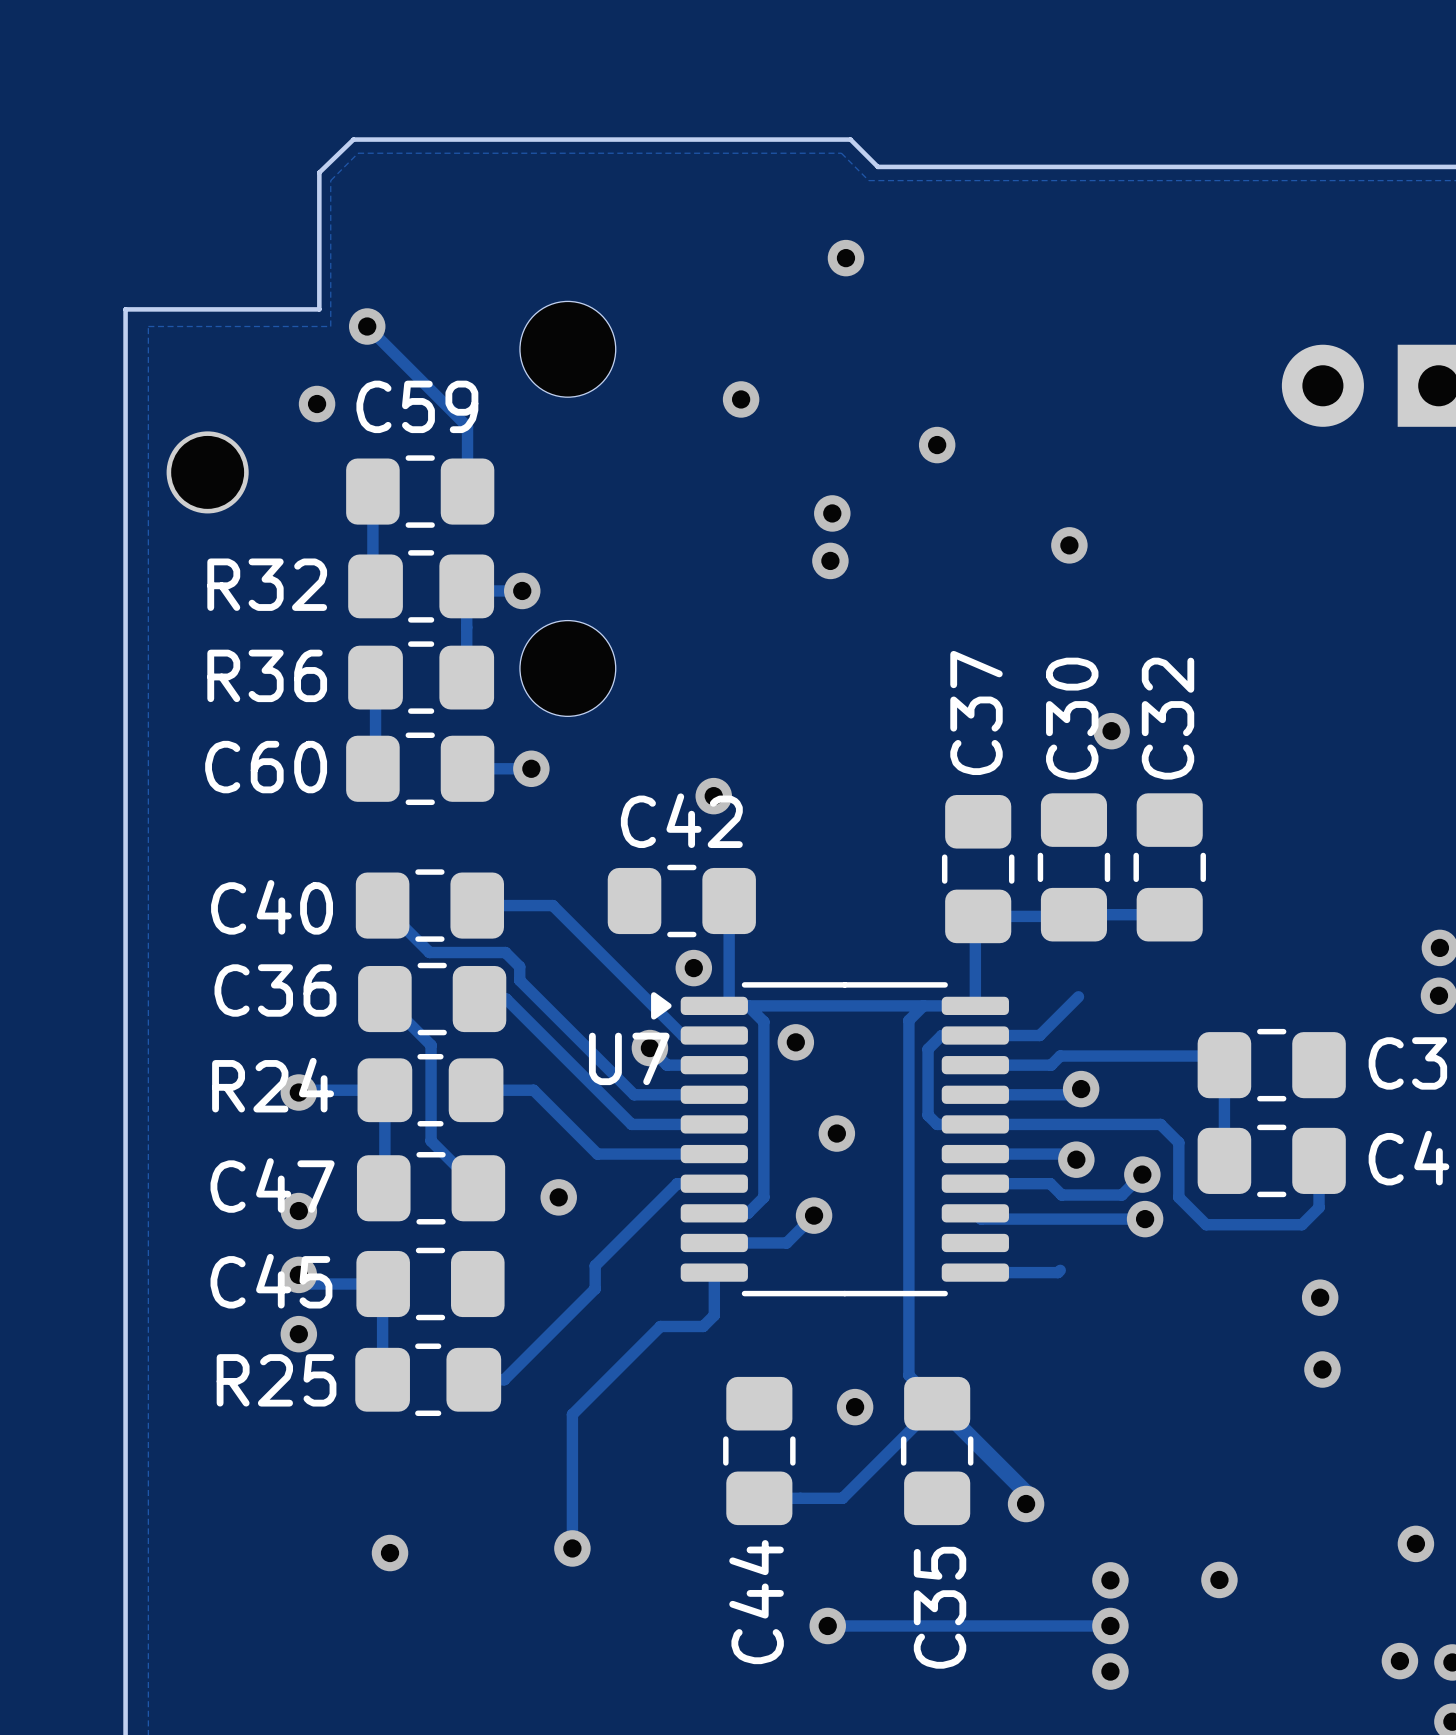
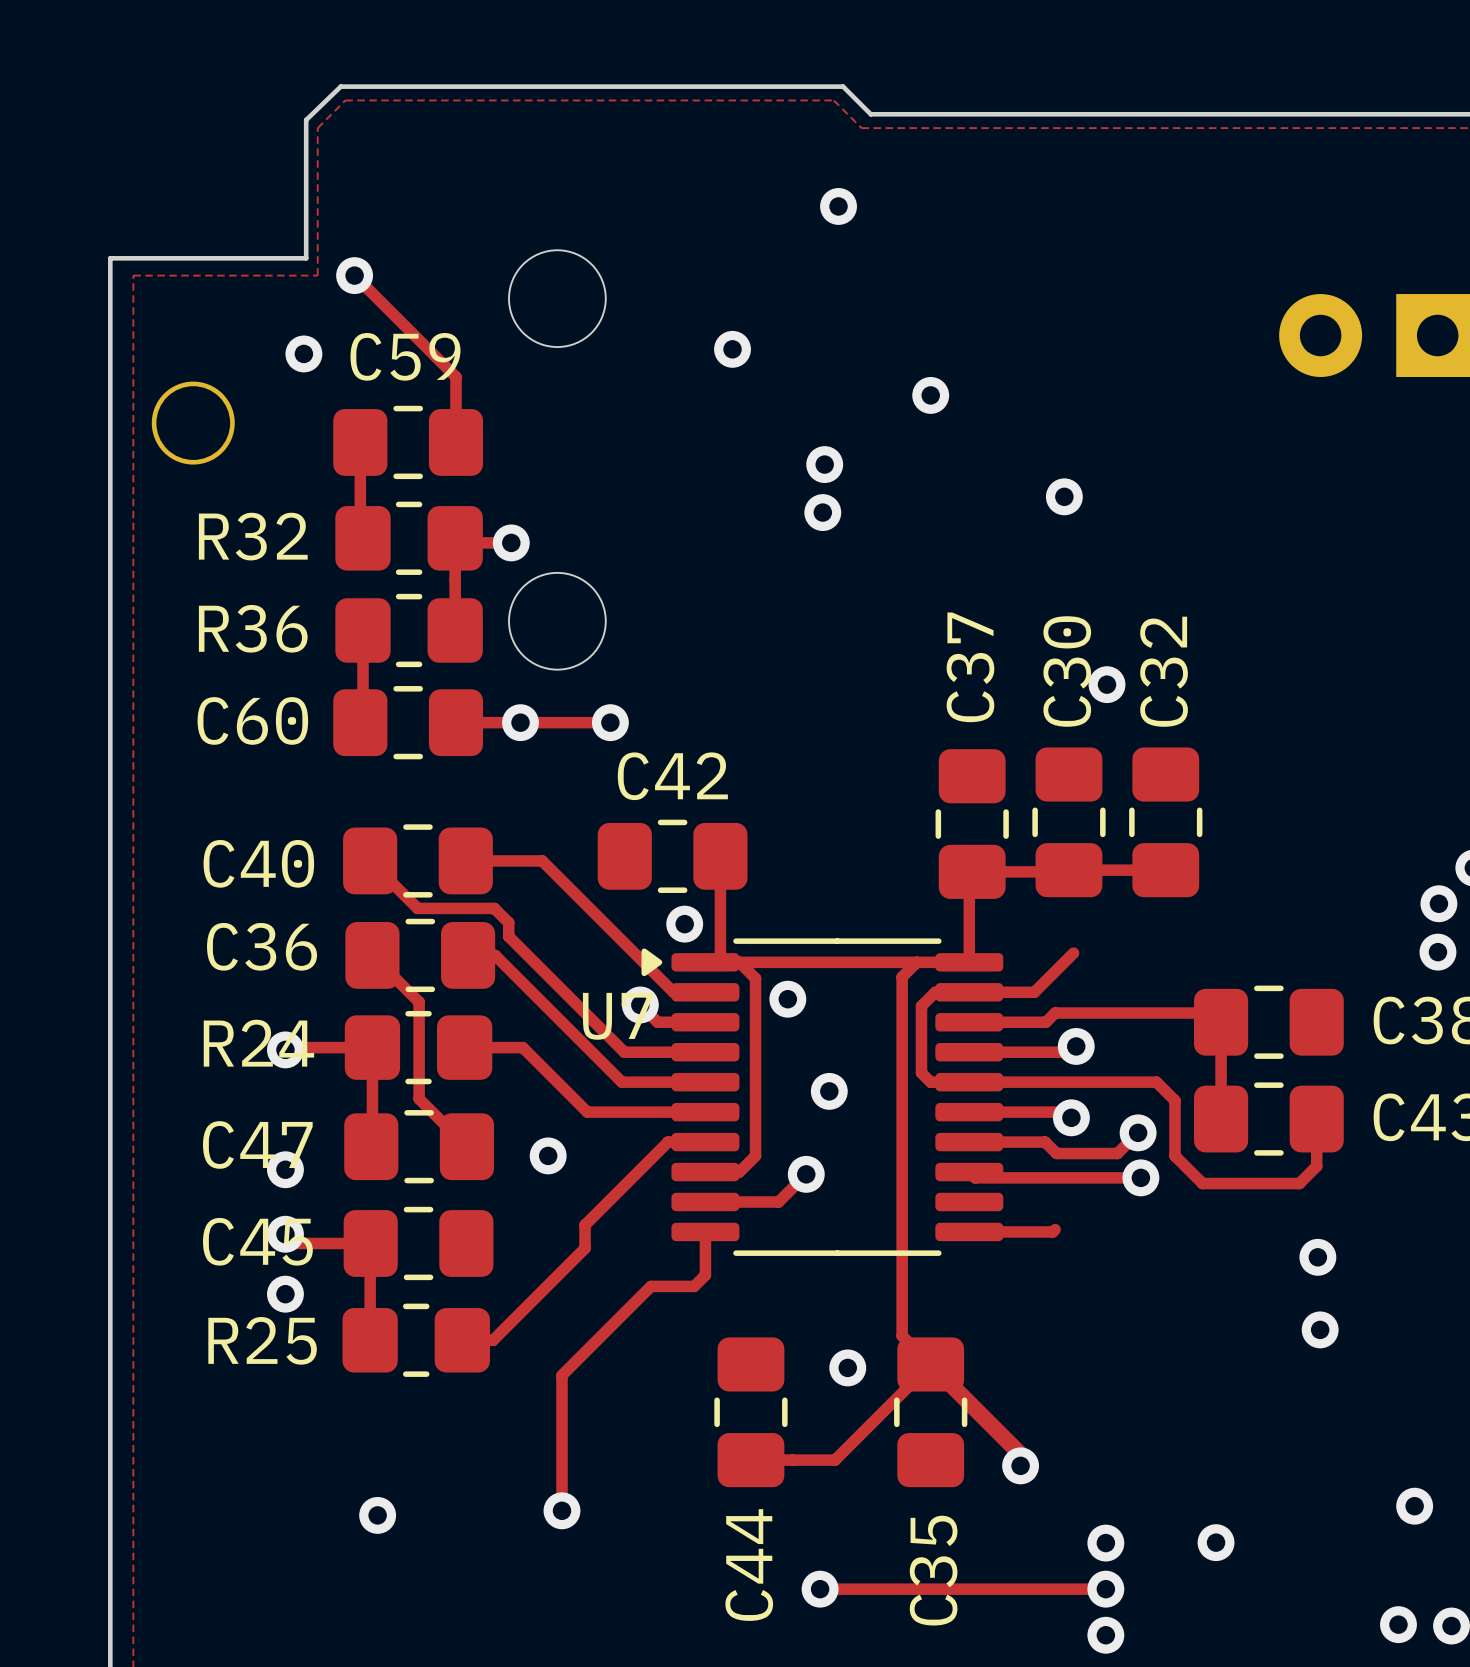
track: none -> (520, 722) (610, 722)
via position: (713, 796) -> (610, 722)

